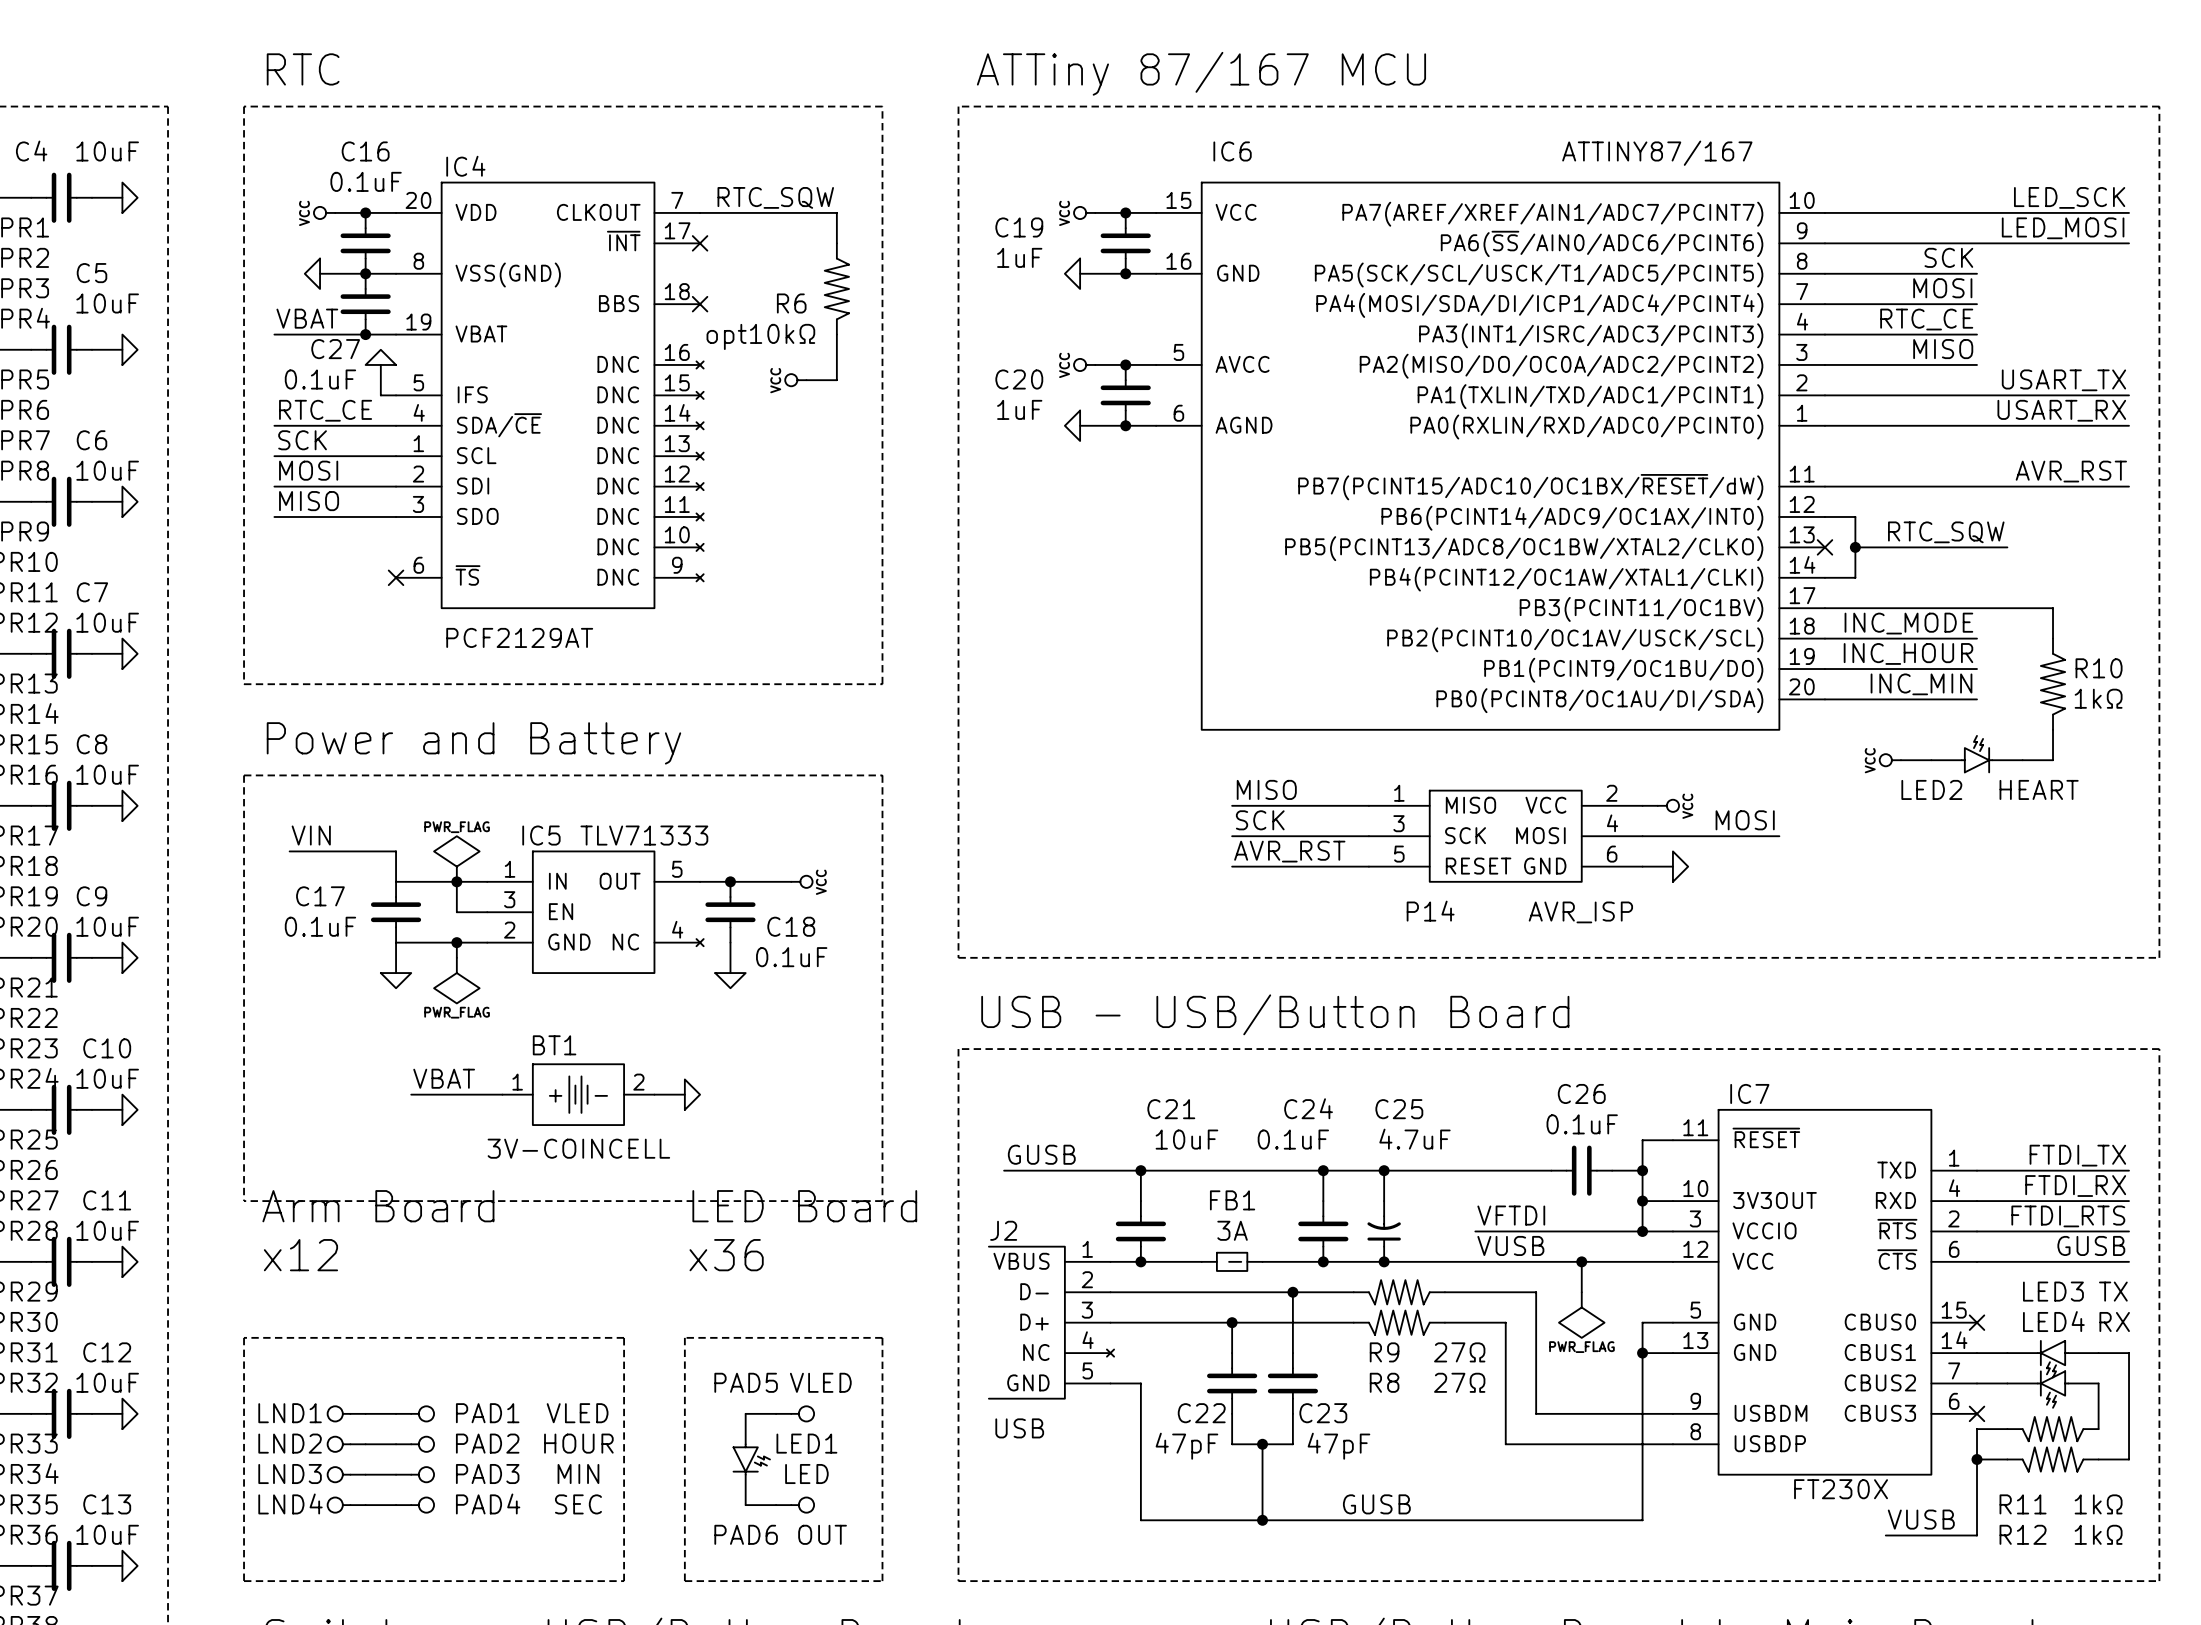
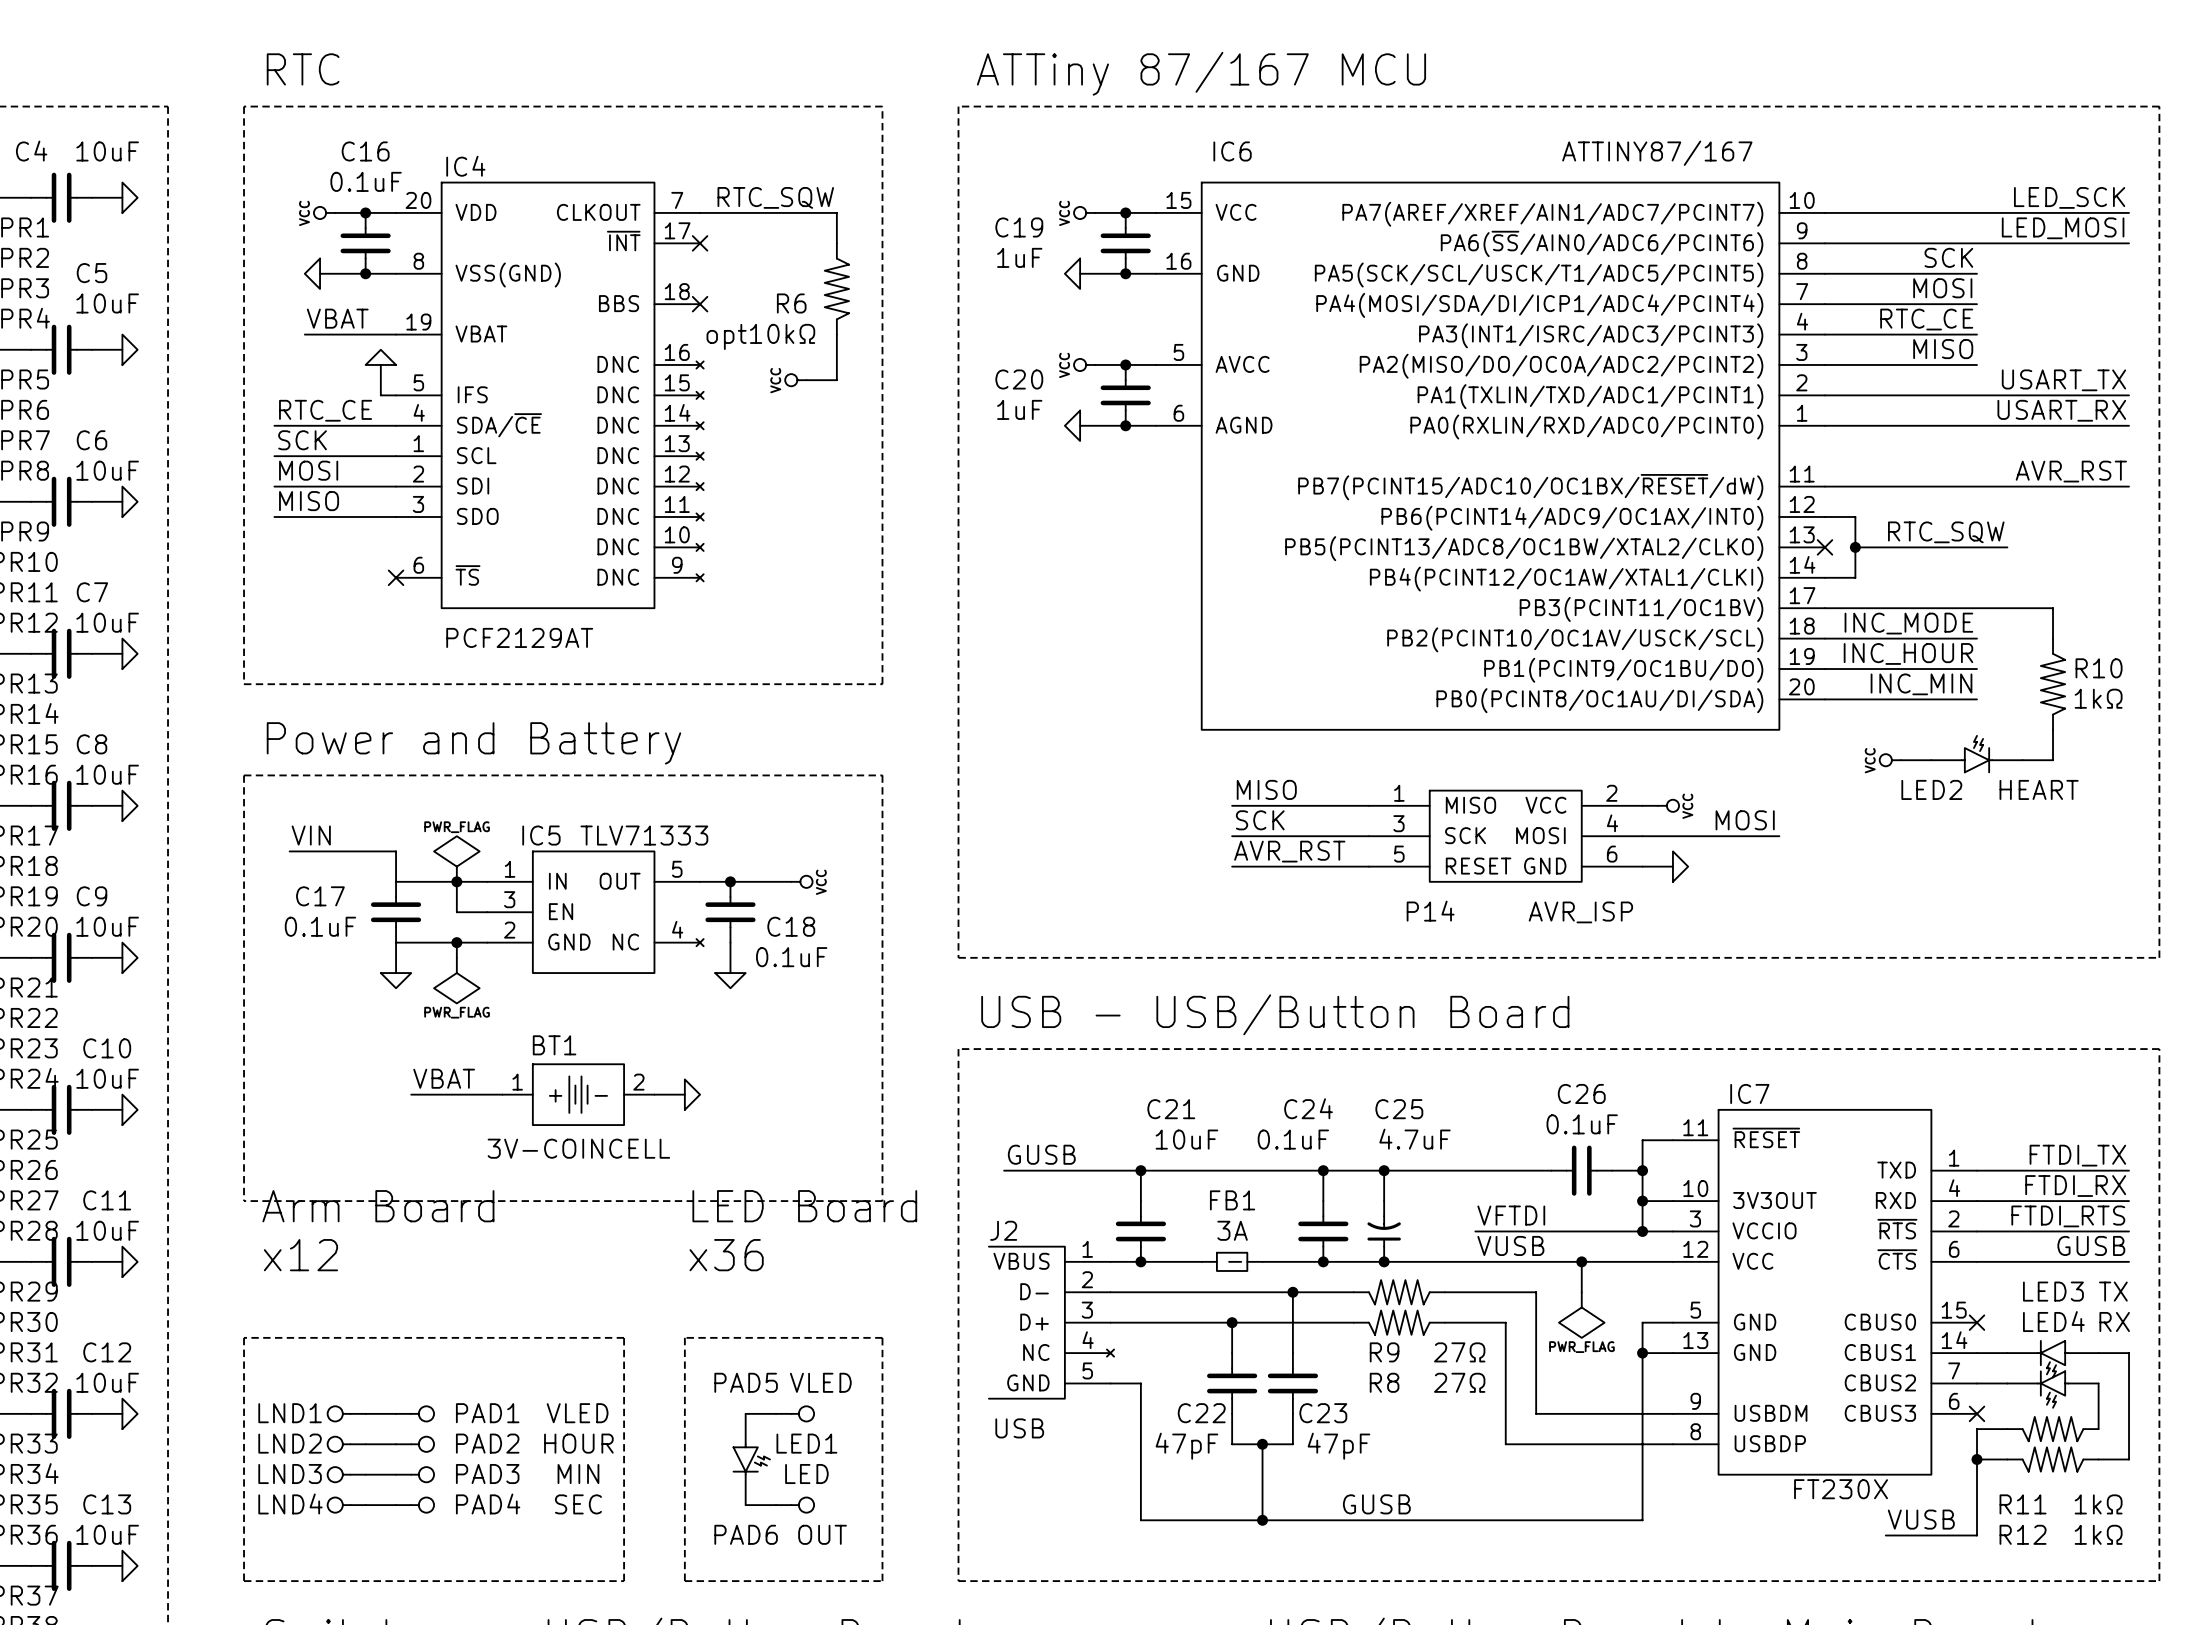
C27: 0.1uF (365, 304) -> none
label position: VBAT (307, 318) -> VBAT (337, 318)
wire: (274, 334) (304, 334) -> none
junction: (365, 334) -> none

